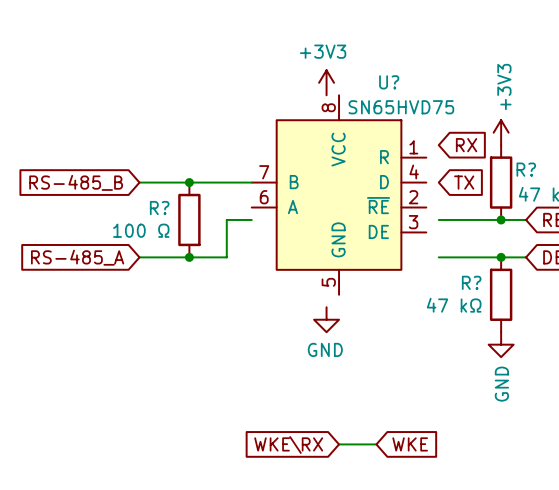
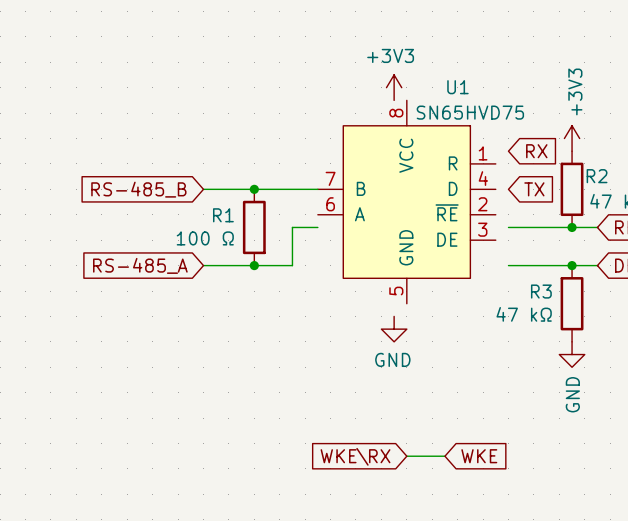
U? name: U? (389, 82) -> U1 (457, 87)
R? name: R? (526, 169) -> R2 (597, 176)
R? name: R? (159, 208) -> R1 (223, 215)
R? name: R? (471, 282) -> R3 (541, 291)

